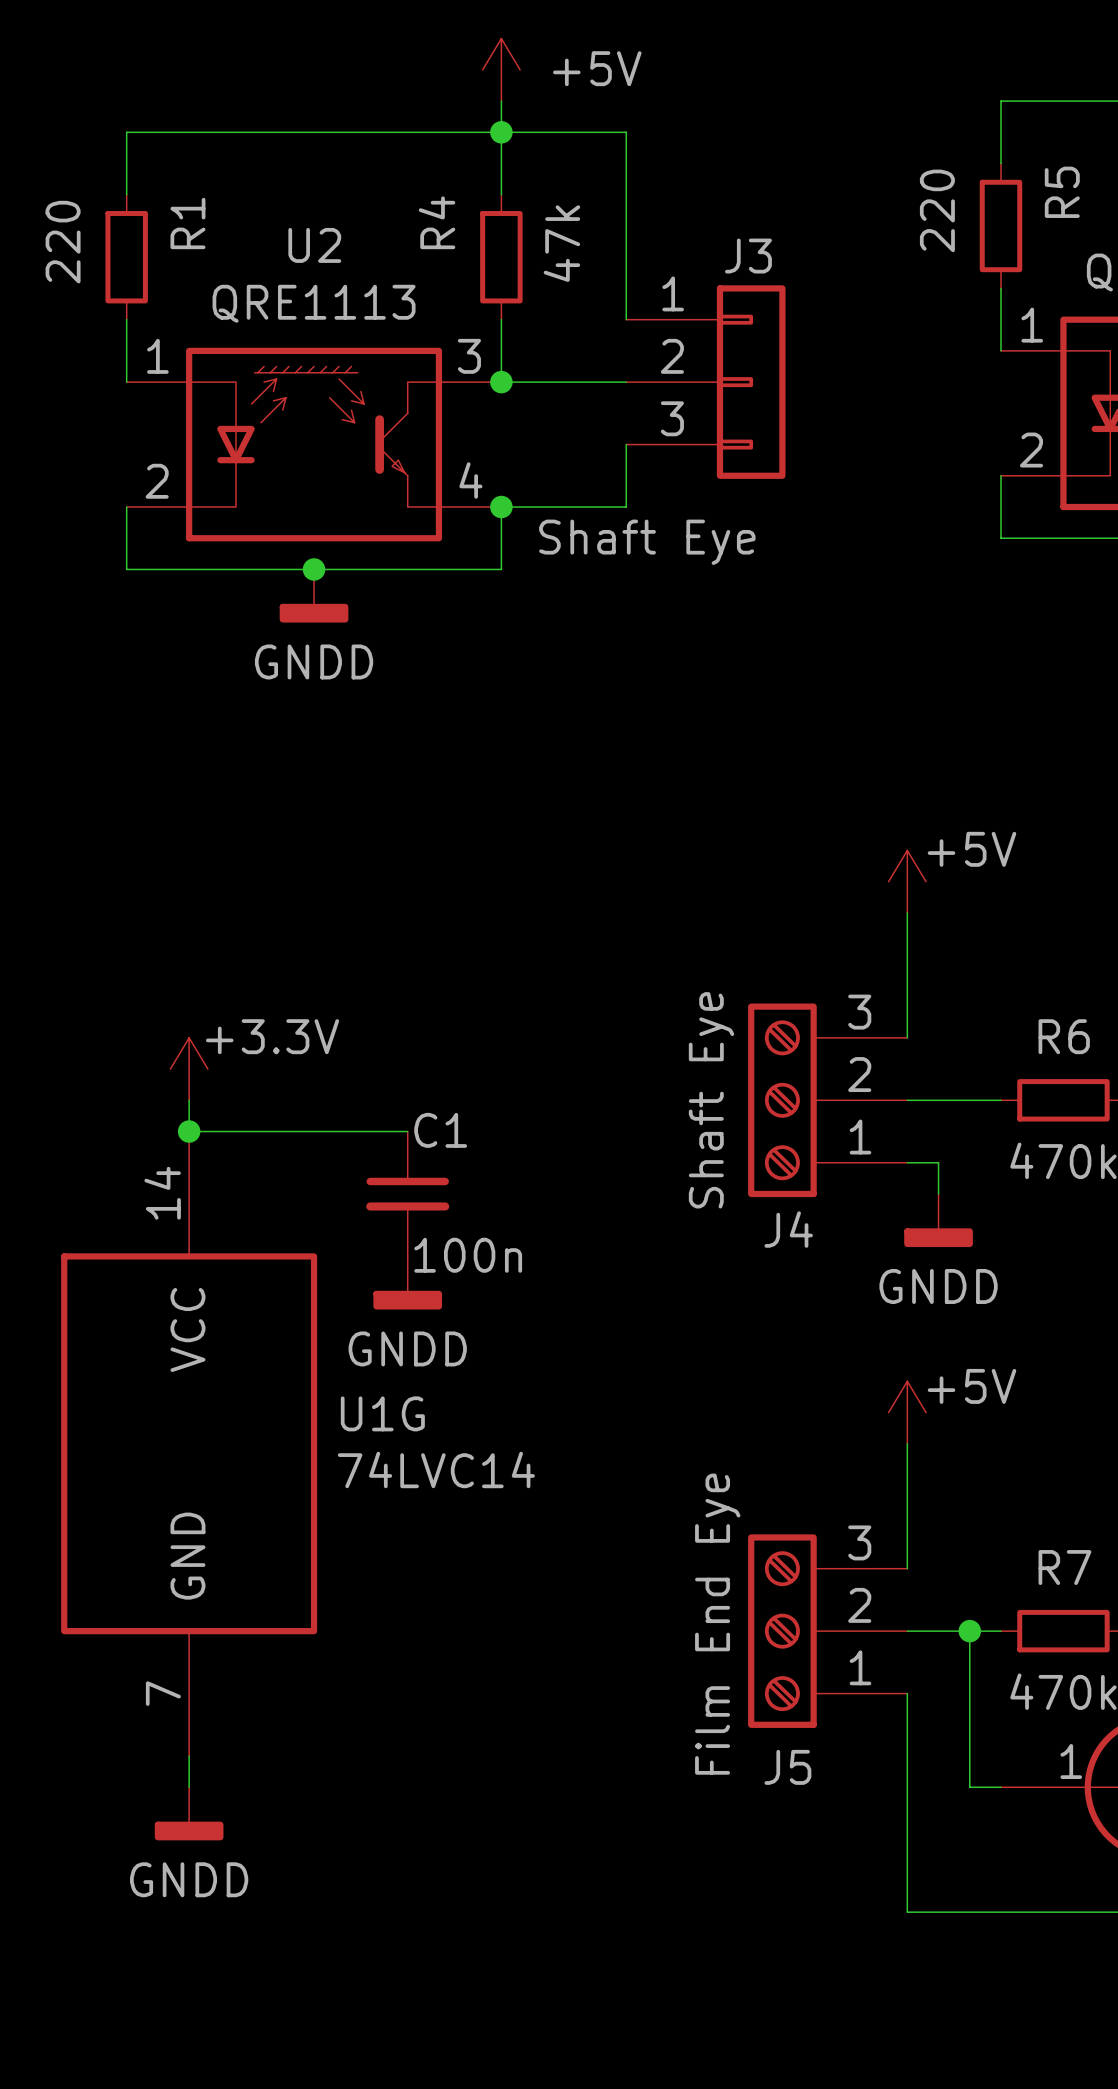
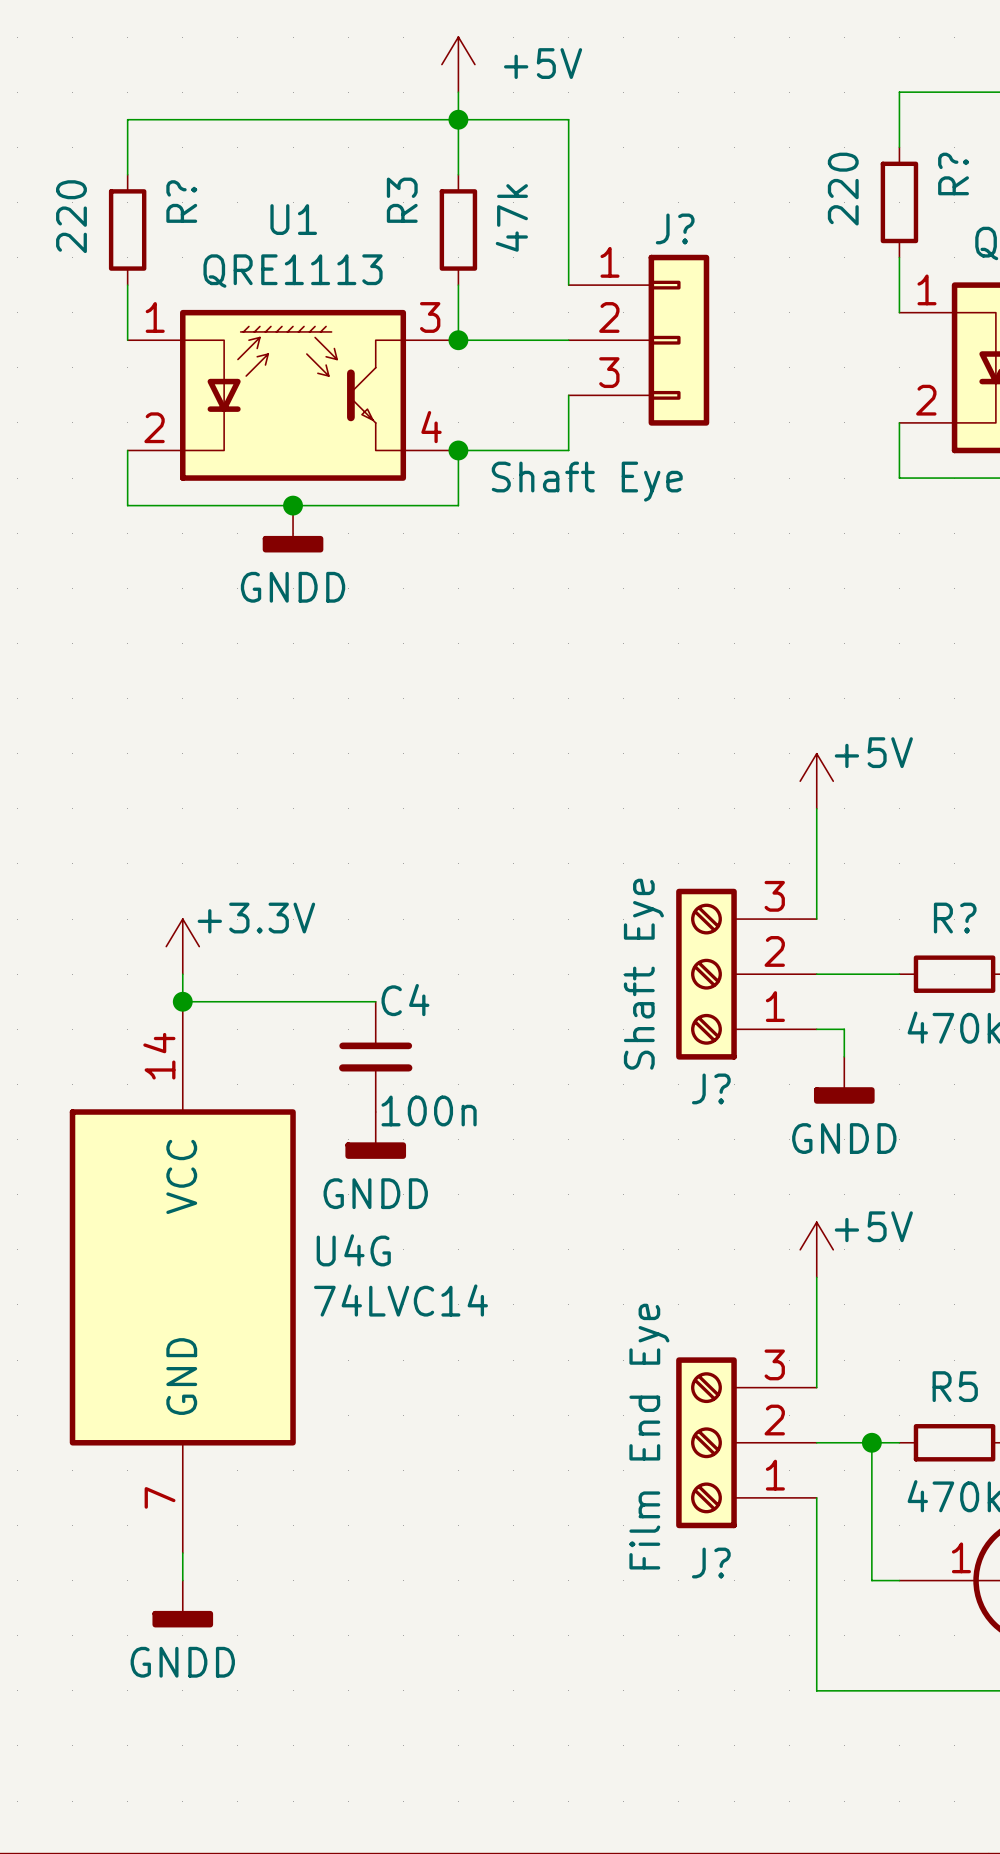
R5 name: R5 (1062, 192) -> R? (953, 173)
R4 name: R4 (437, 222) -> R3 (402, 200)
R1 name: R1 (187, 223) -> R? (181, 201)
U2 name: U2 (314, 245) -> U1 (293, 219)
J3 name: J3 (748, 256) -> J? (675, 228)
R6 name: R6 (1064, 1036) -> R? (955, 918)
C1 name: C1 (440, 1130) -> C4 (405, 1000)
J4 name: J4 (788, 1229) -> J? (711, 1088)
U1G name: U1G (382, 1413) -> U4G (353, 1250)
R7 name: R7 (1064, 1567) -> R5 (955, 1386)
J5 name: J5 (787, 1767) -> J? (711, 1563)

